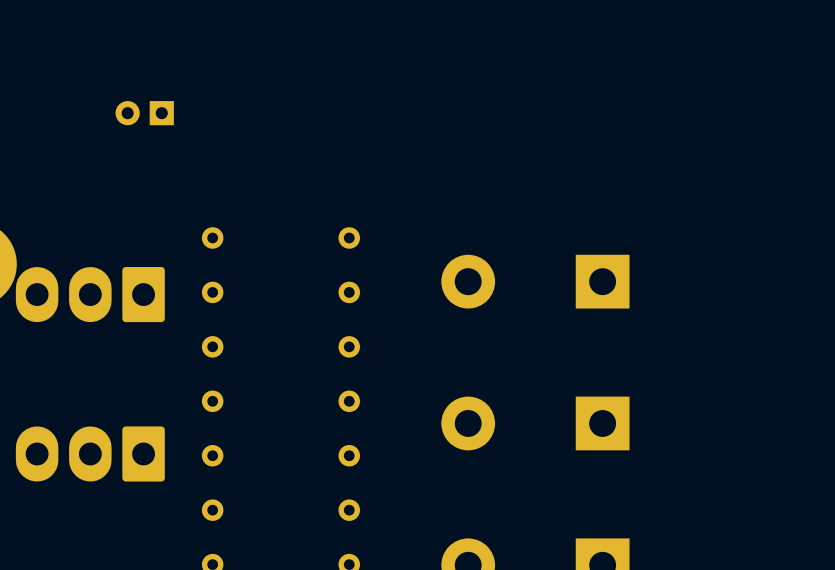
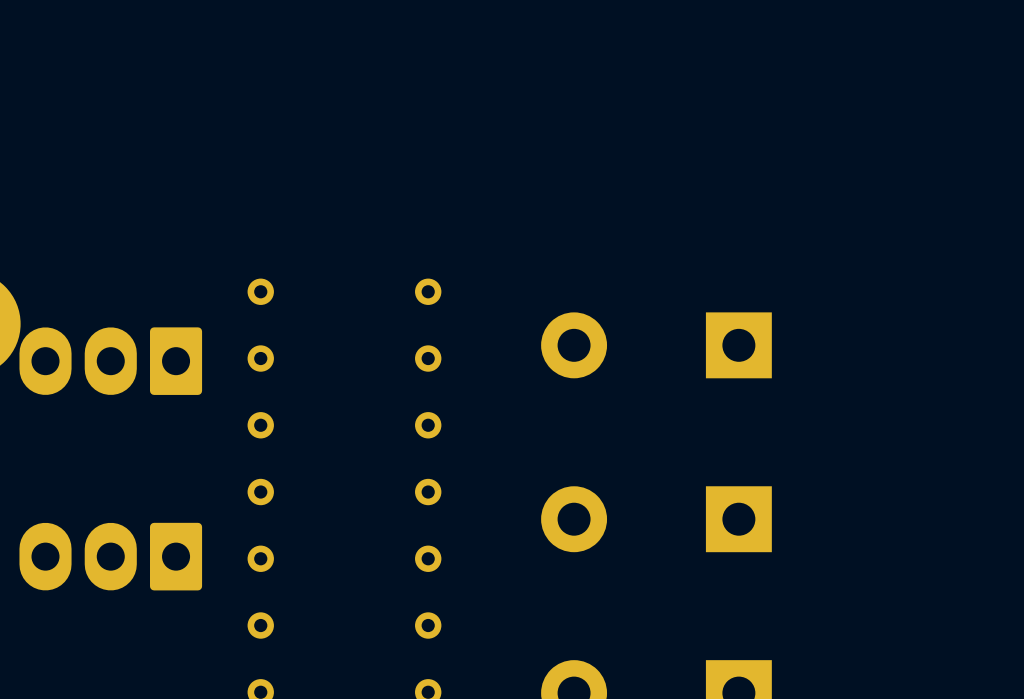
part: (144, 113) -> none

